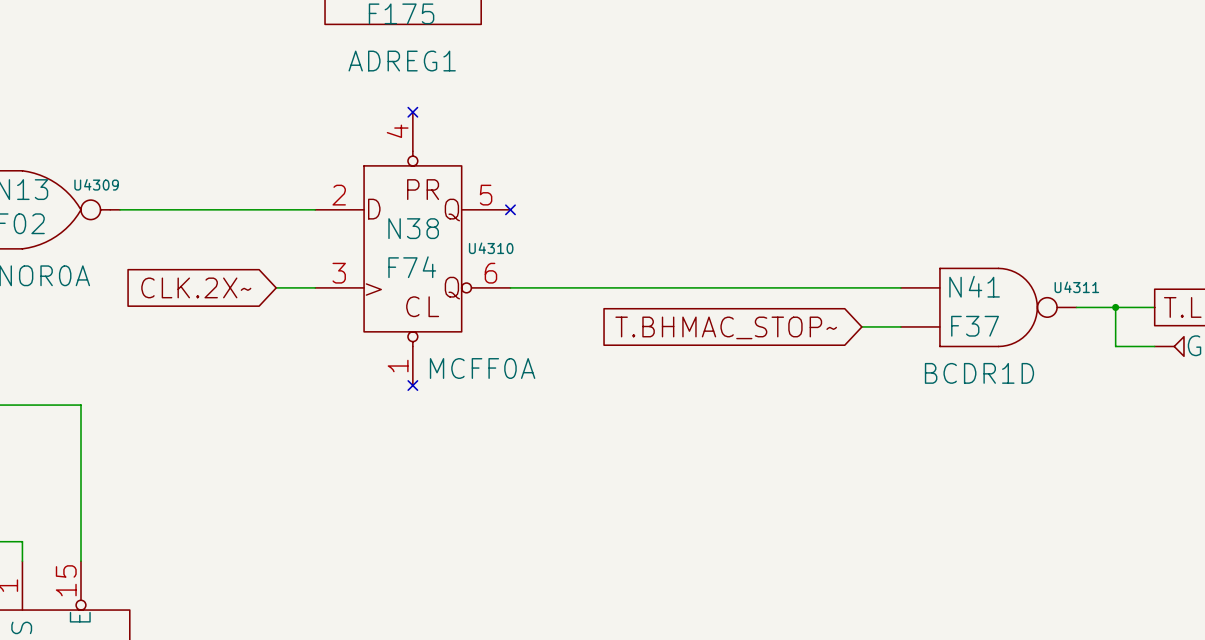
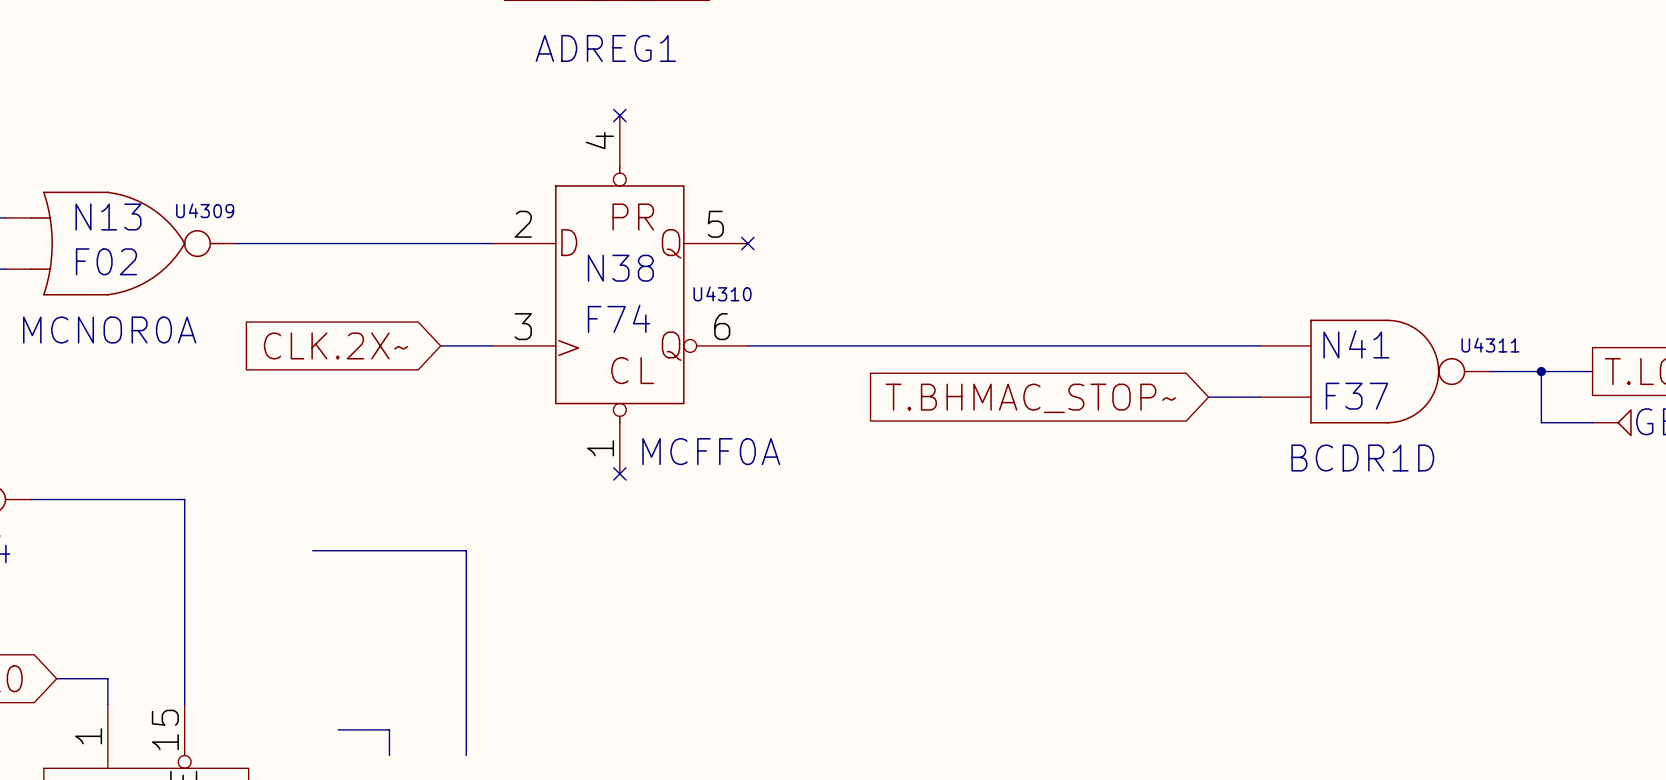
wire: none -> (312, 550) (466, 550) (466, 755)
wire: none -> (338, 729) (389, 729) (389, 755)

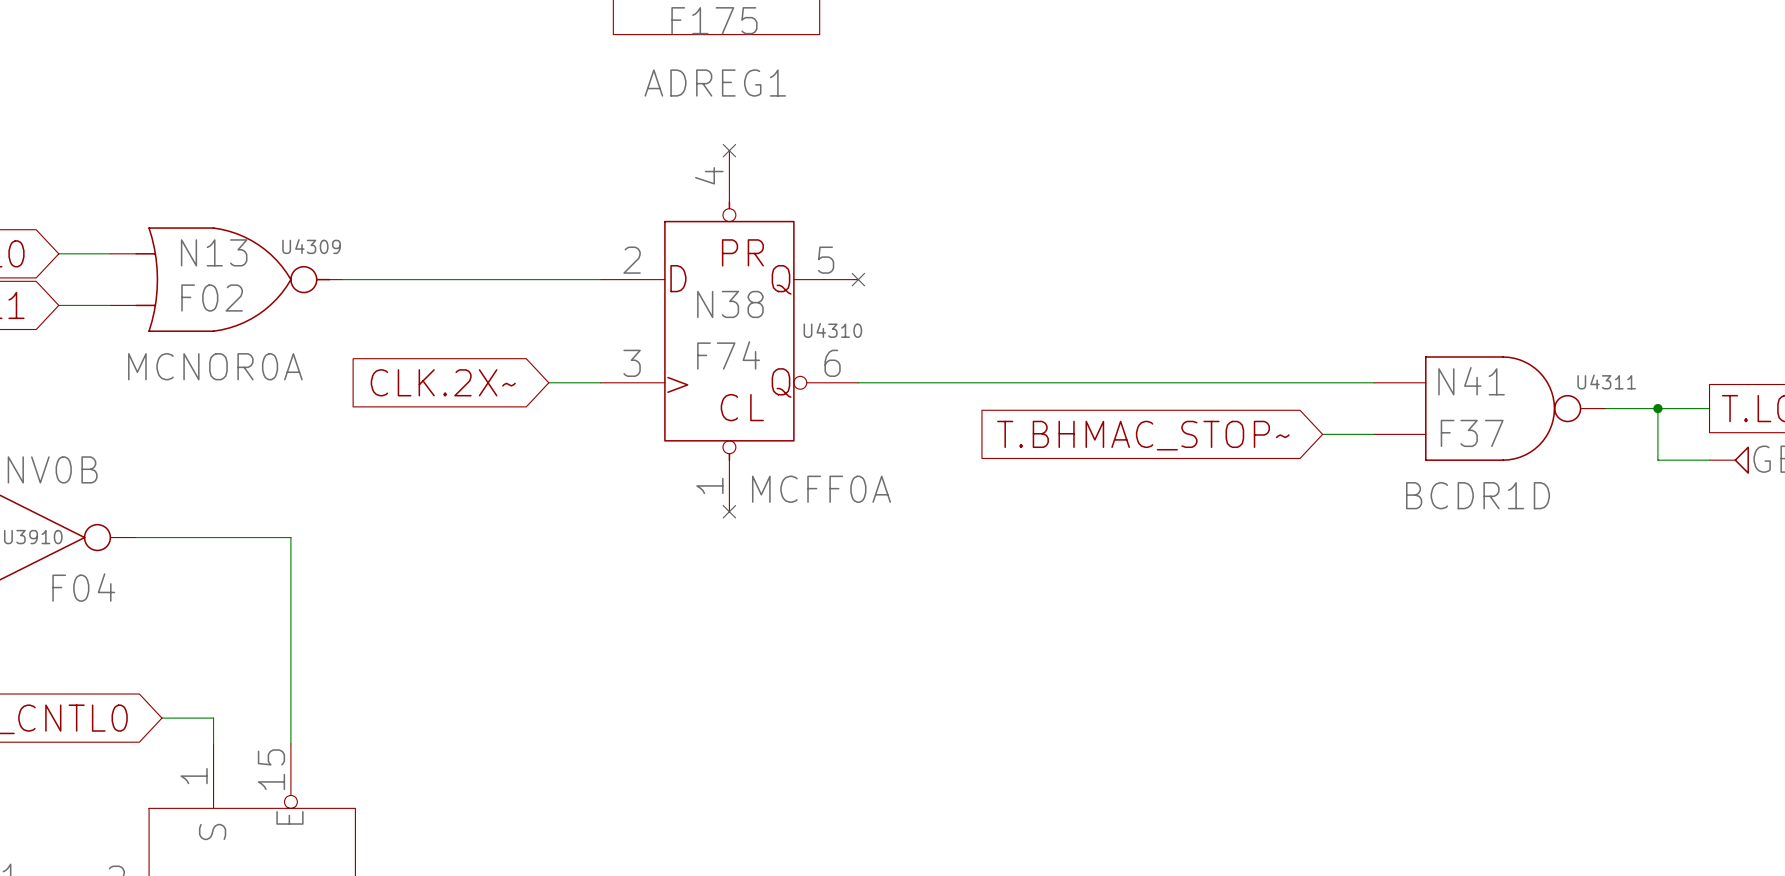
wire: (312, 550) (466, 550) (466, 755) -> none
wire: (338, 729) (389, 729) (389, 755) -> none

